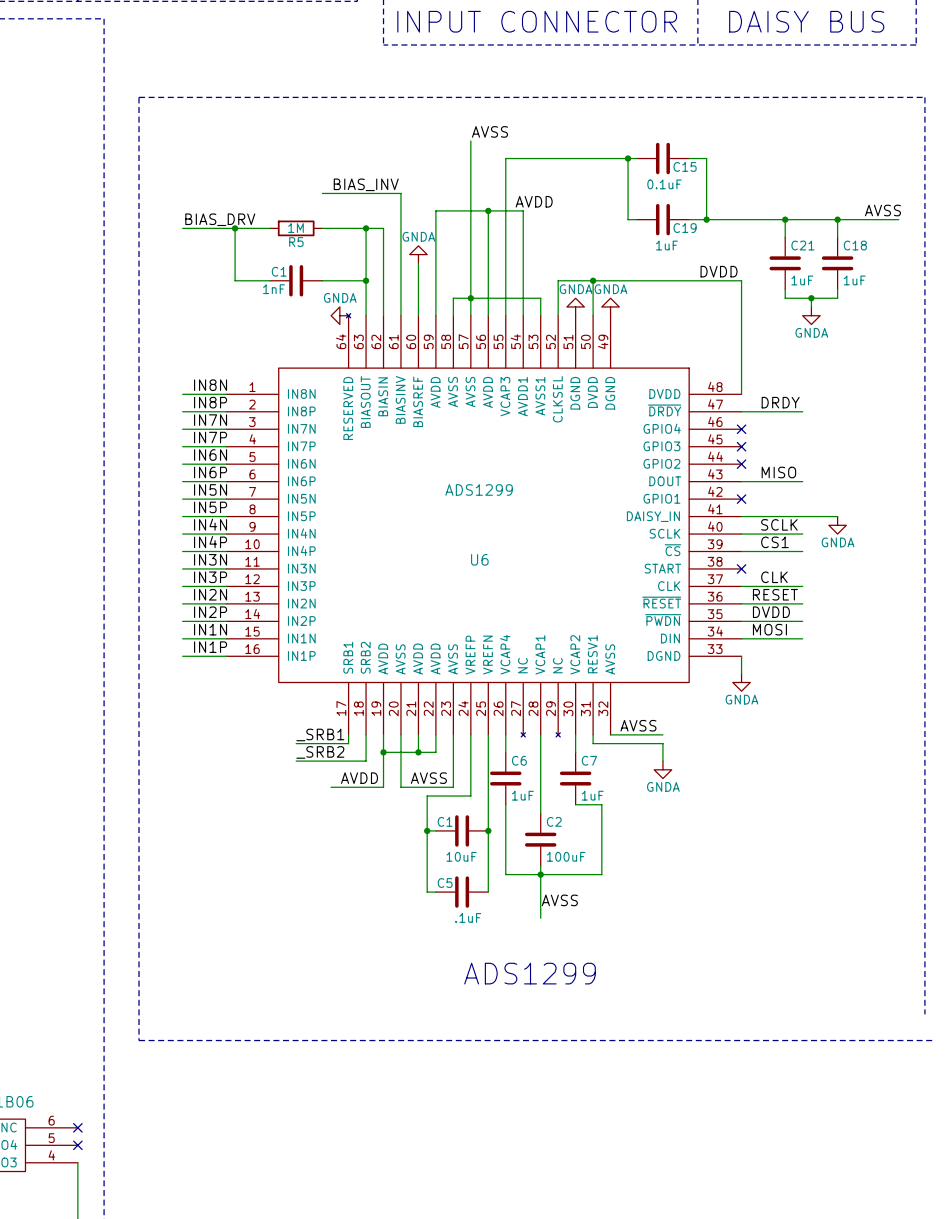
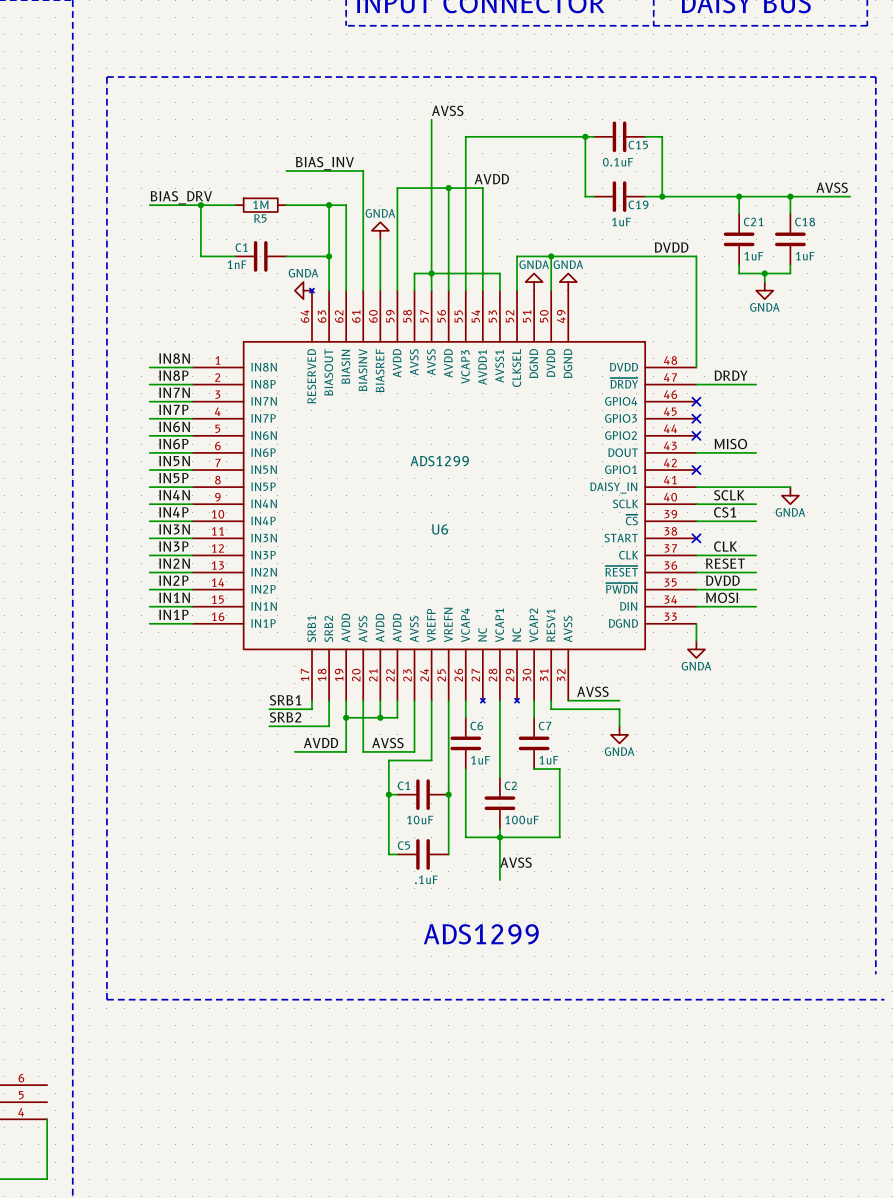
label: _SRB1 (320, 734) -> SRB1 (285, 700)
wire: (296, 743) (304, 743) -> none
label: _SRB2 (320, 752) -> SRB2 (285, 717)
wire: (296, 761) (304, 761) -> none
no-connect mark: (77, 1127) -> none
no-connect mark: (77, 1145) -> none

